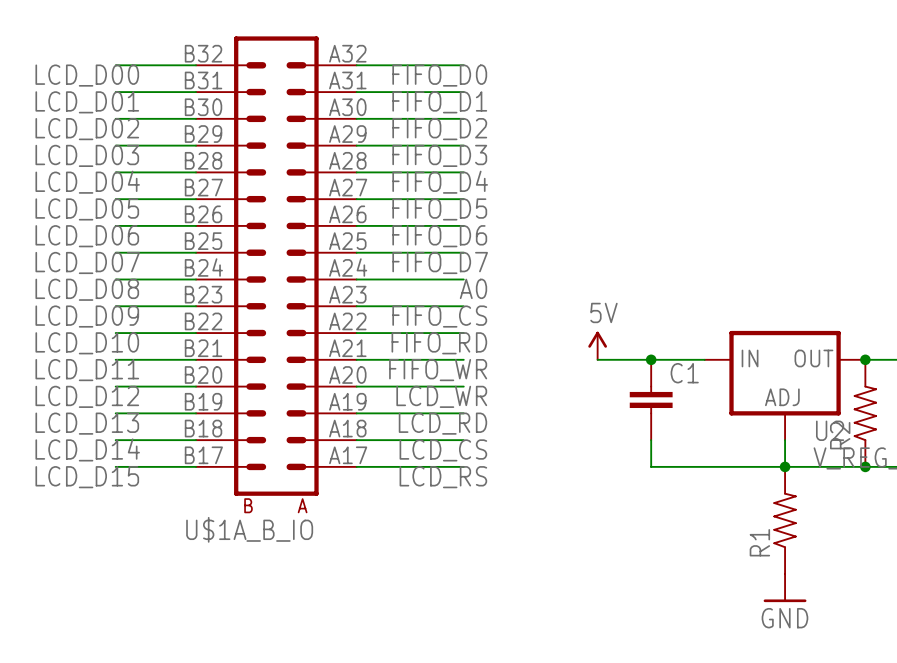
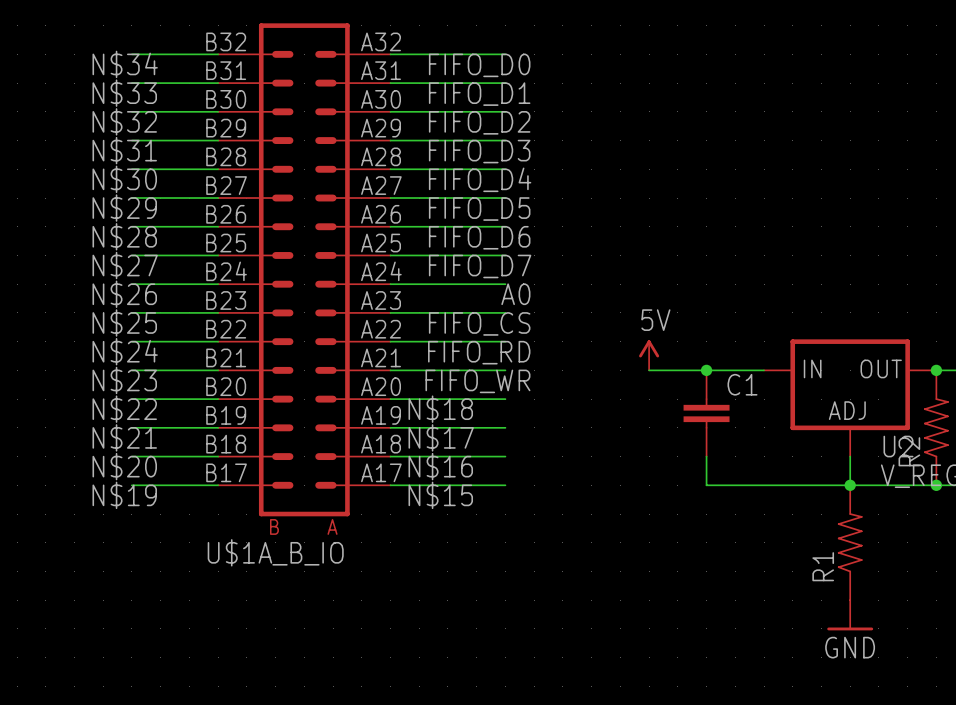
label: LCD_D00 (87, 75) -> N$34 (125, 64)
label: LCD_D01 (87, 102) -> N$33 (124, 93)
label: LCD_D02 (87, 129) -> N$32 (124, 121)
label: LCD_D03 (87, 155) -> N$31 (124, 150)
label: LCD_D04 (87, 182) -> N$30 (124, 179)
label: LCD_D05 (87, 209) -> N$29 (124, 208)
label: LCD_D06 (87, 236) -> N$28 (124, 236)
label: LCD_D07 (87, 262) -> N$27 (125, 265)
label: LCD_D08 (87, 289) -> N$26 (124, 294)
label: LCD_D09 (87, 316) -> N$25 (124, 322)
label: LCD_D10 (87, 343) -> N$24 (125, 351)
label: LCD_D11 (87, 370) -> N$23 (124, 380)
label: none -> N$18 (440, 409)
label: LCD_D12 (87, 396) -> N$22 (124, 409)
label: LCD_WR (441, 396) -> none
label: none -> N$17 (441, 437)
label: LCD_D13 (87, 423) -> N$21 (124, 437)
label: LCD_RD (442, 423) -> none
label: LCD_D14 (87, 449) -> N$20 (124, 466)
label: none -> N$16 (440, 466)
label: LCD_CS (443, 450) -> none
label: none -> N$15 (440, 495)
label: LCD_D15 (87, 477) -> N$19 (124, 495)
label: LCD_RS (443, 477) -> none

